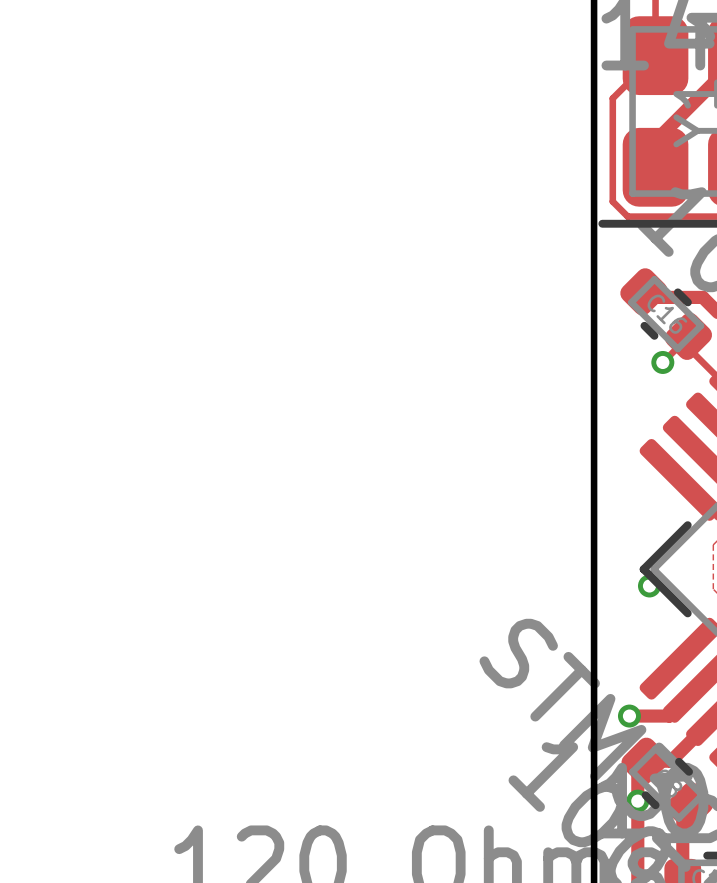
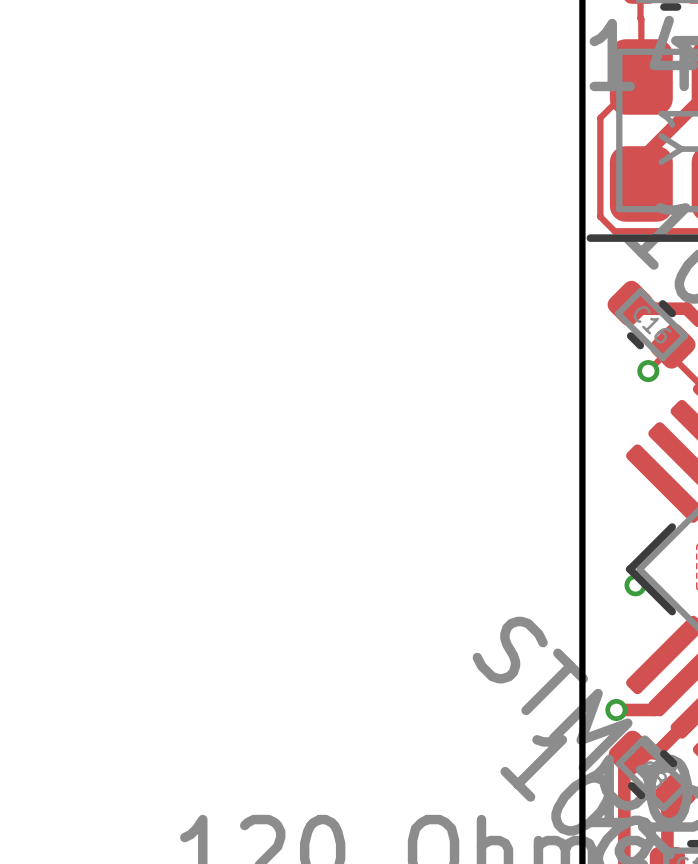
via: (637, 801) -> none

